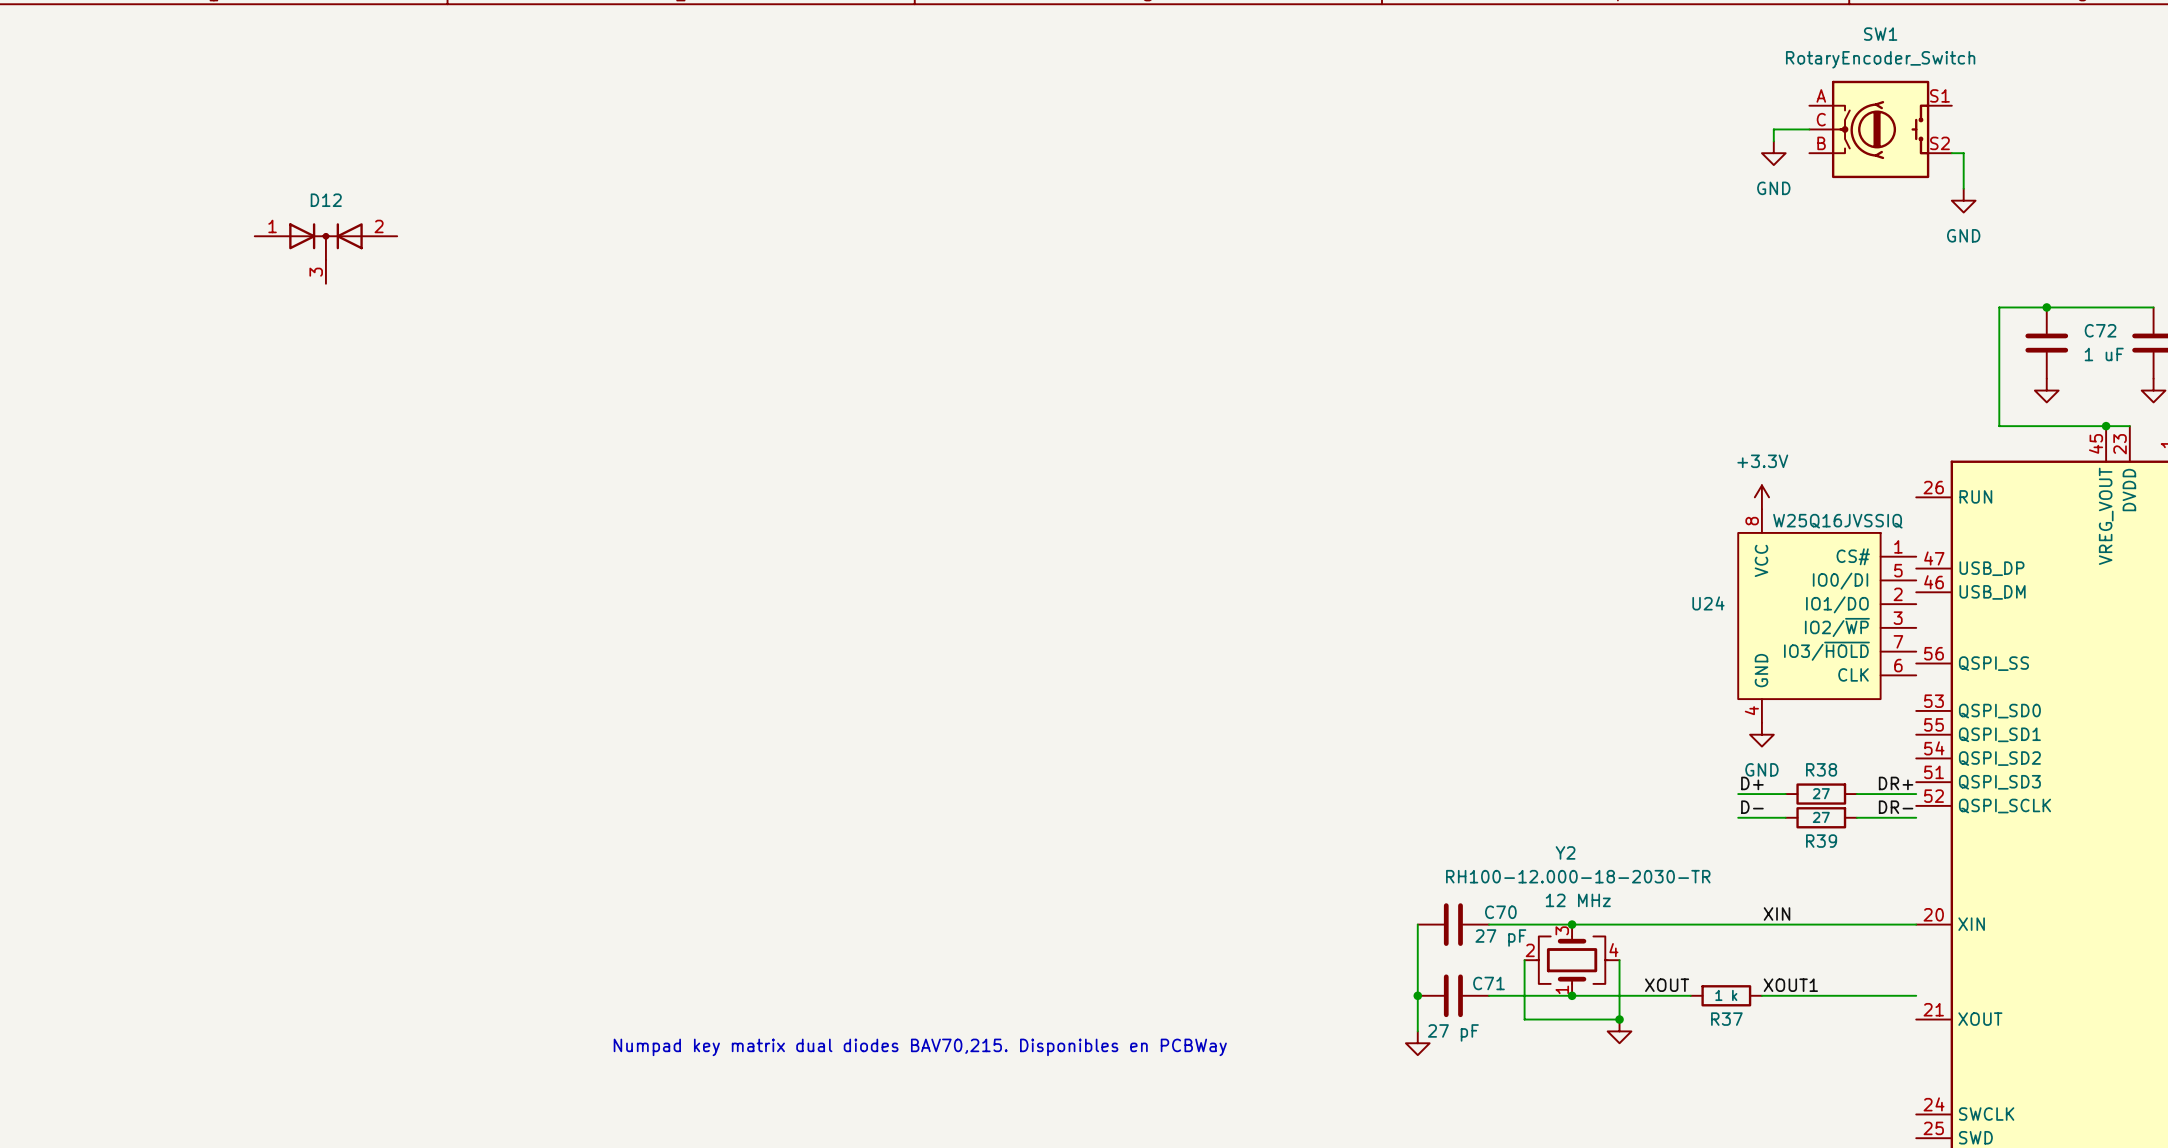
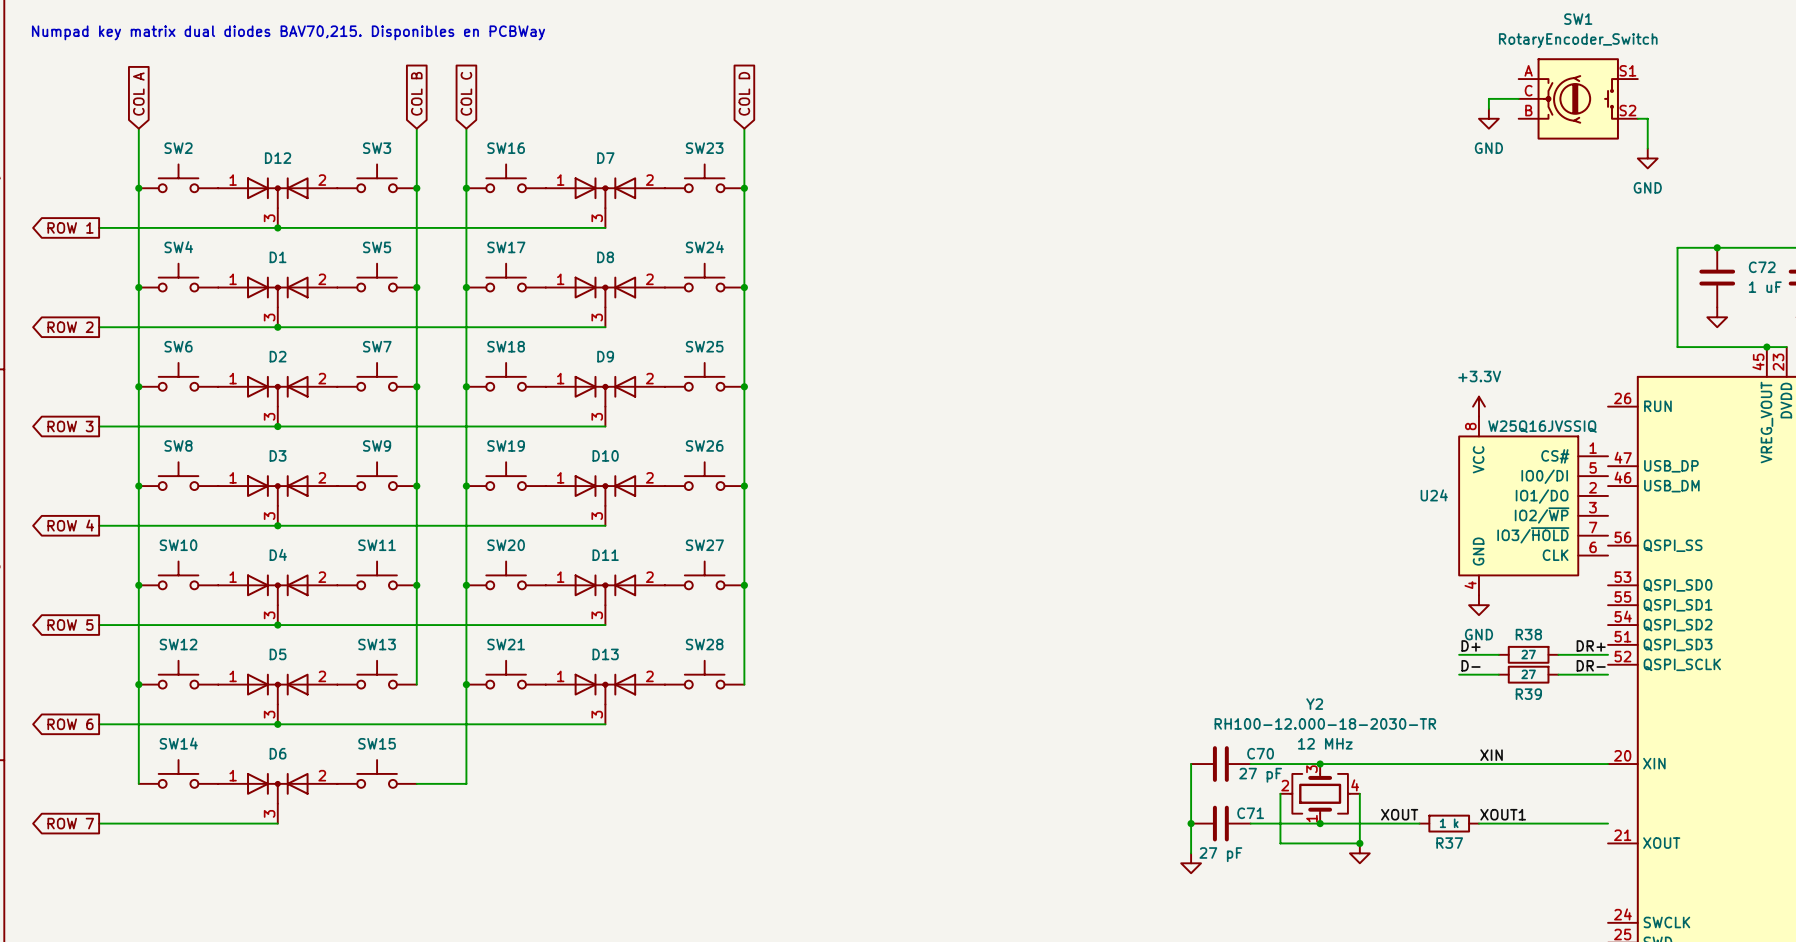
text: none -> Numpad key matrix dual diodes BAV70,215. Disponibles en PCBWay (288, 32)
global label: none -> COL A (138, 94)
global label: none -> COL B (416, 93)
global label: none -> COL C (466, 93)
global label: none -> COL D (744, 93)
wire: none -> (138, 128) (138, 783)
wire: none -> (416, 128) (416, 684)
wire: none -> (466, 128) (466, 783) (416, 783)
wire: none -> (744, 128) (744, 684)
SW2: none -> (178, 178)
SW3: none -> (377, 178)
SW16: none -> (506, 178)
SW23: none -> (704, 178)
junction: none -> (138, 188)
junction: none -> (416, 188)
junction: none -> (466, 188)
junction: none -> (744, 188)
D7: none -> (605, 202)
global label: none -> ROW 1 (70, 227)
wire: none -> (99, 227) (605, 227)
junction: none -> (277, 227)
SW4: none -> (178, 277)
SW5: none -> (377, 277)
SW17: none -> (506, 277)
SW24: none -> (704, 277)
junction: none -> (138, 287)
junction: none -> (416, 287)
junction: none -> (466, 287)
junction: none -> (744, 287)
D1: none -> (277, 301)
D8: none -> (605, 301)
global label: none -> ROW 2 (70, 327)
wire: none -> (99, 327) (605, 327)
junction: none -> (277, 327)
SW6: none -> (178, 376)
SW7: none -> (377, 376)
SW18: none -> (506, 376)
SW25: none -> (704, 376)
junction: none -> (138, 386)
junction: none -> (416, 386)
junction: none -> (466, 386)
junction: none -> (744, 386)
D2: none -> (277, 401)
D9: none -> (605, 401)
global label: none -> ROW 3 (70, 426)
wire: none -> (99, 426) (605, 426)
junction: none -> (277, 426)
SW8: none -> (178, 476)
SW9: none -> (377, 476)
SW19: none -> (506, 476)
SW26: none -> (704, 476)
junction: none -> (138, 486)
junction: none -> (416, 486)
junction: none -> (466, 486)
junction: none -> (744, 486)
D3: none -> (277, 500)
D10: none -> (605, 500)
global label: none -> ROW 4 (70, 525)
wire: none -> (99, 525) (605, 525)
junction: none -> (277, 525)
SW10: none -> (178, 575)
SW11: none -> (377, 575)
SW20: none -> (506, 575)
SW27: none -> (704, 575)
junction: none -> (138, 585)
junction: none -> (416, 585)
junction: none -> (466, 585)
junction: none -> (744, 585)
D4: none -> (277, 599)
D11: none -> (605, 599)
global label: none -> ROW 5 (70, 625)
wire: none -> (99, 625) (605, 625)
junction: none -> (277, 625)
SW12: none -> (178, 674)
SW13: none -> (377, 674)
SW21: none -> (506, 674)
SW28: none -> (704, 674)
junction: none -> (138, 684)
junction: none -> (466, 684)
D5: none -> (277, 699)
D13: none -> (605, 699)
global label: none -> ROW 6 (70, 724)
wire: none -> (99, 724) (605, 724)
junction: none -> (277, 724)
SW14: none -> (178, 773)
SW15: none -> (377, 773)
D6: none -> (277, 798)
global label: none -> ROW 7 (70, 823)
wire: none -> (99, 823) (277, 823)
text: Numpad key matrix dual diodes BAV70,215. Disponibles en PCBWay (920, 1047) -> none

